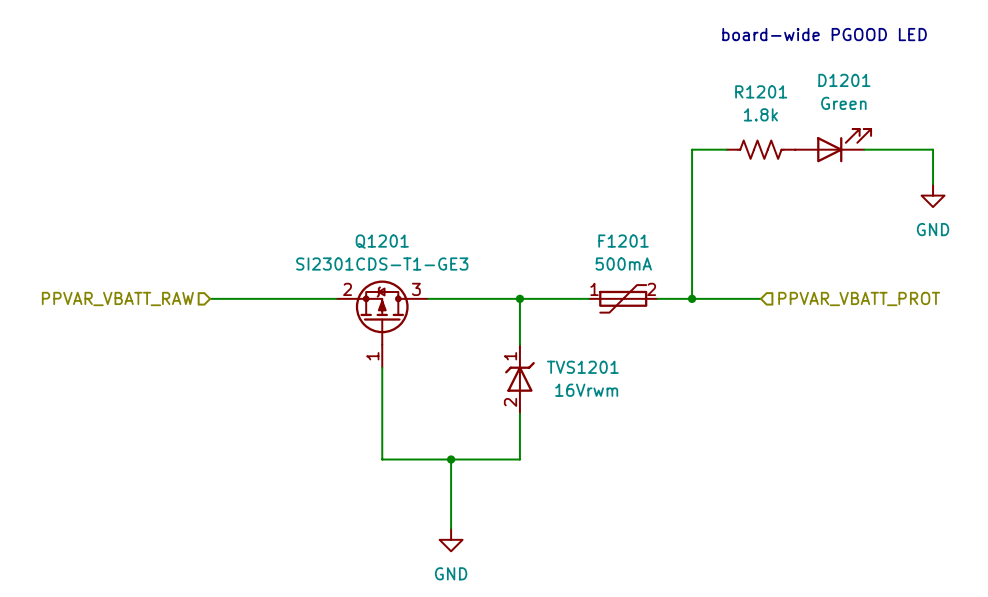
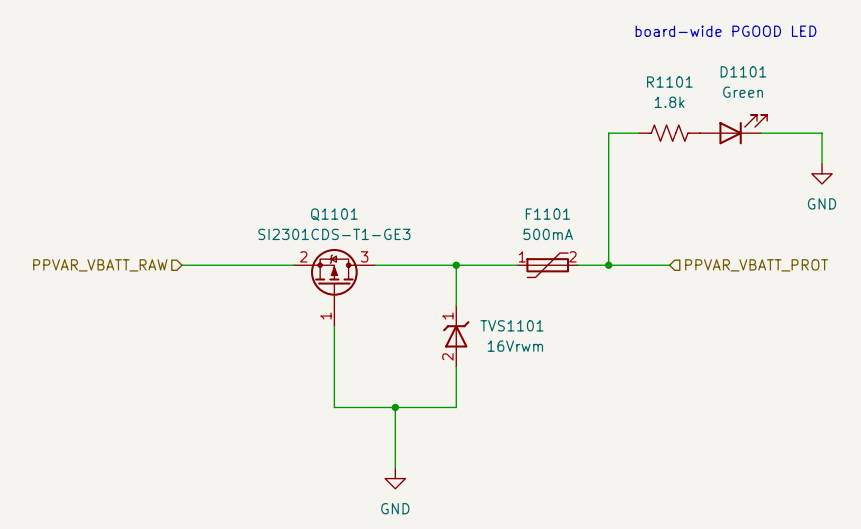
D1201 name: D1201 (844, 80) -> D1101 (743, 71)
R1201 name: R1201 (761, 91) -> R1101 (669, 82)
Q1201 name: Q1201 (382, 241) -> Q1101 (334, 214)
F1201 name: F1201 (623, 241) -> F1101 (547, 214)
TVS1201 name: TVS1201 (582, 367) -> TVS1101 (511, 325)

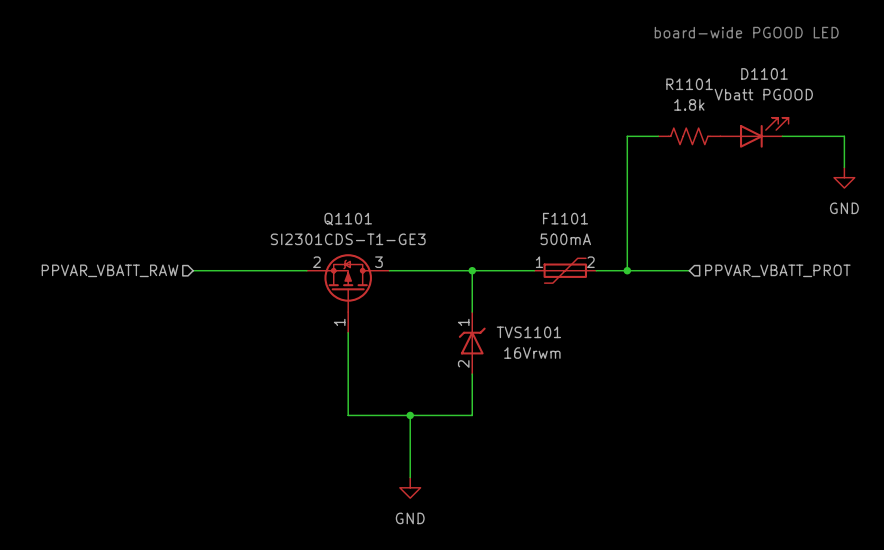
D1101 value: Green (743, 92) -> Vbatt PGOOD (763, 94)

